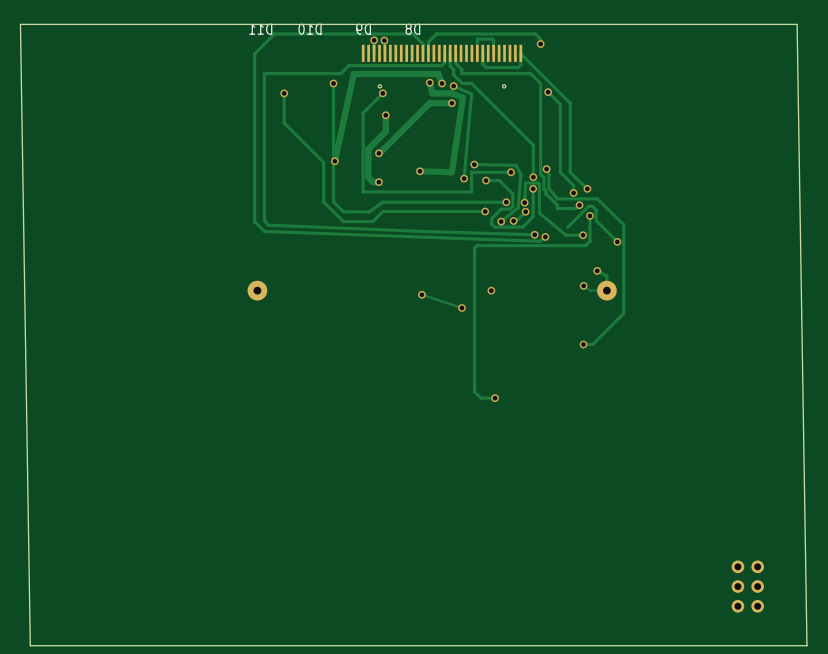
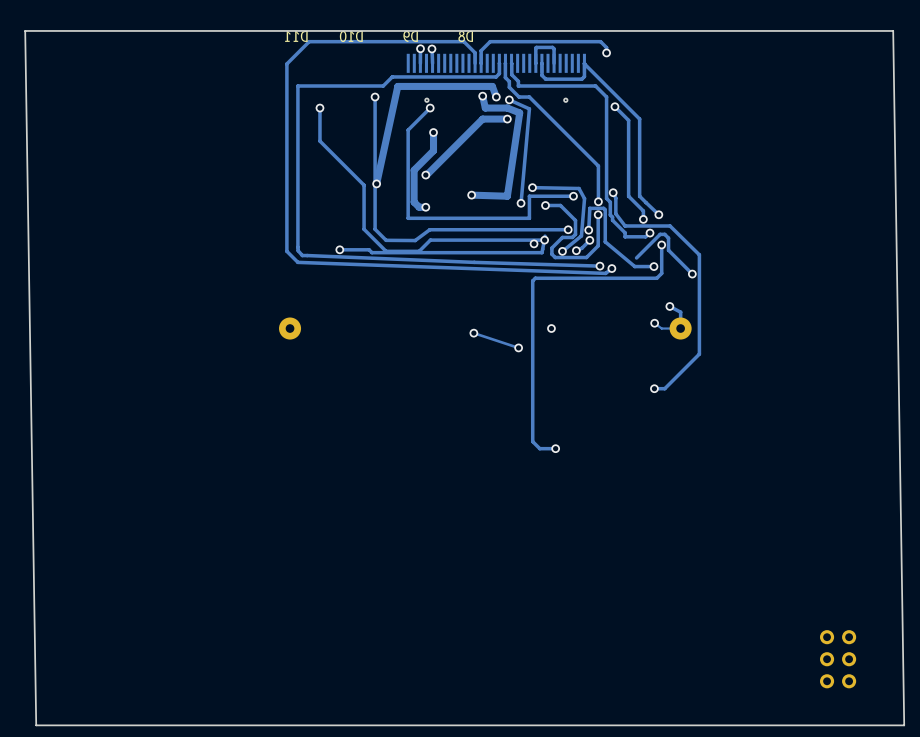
track: none -> (545, 236) (541, 252) (372, 252) (369, 249) (339, 249)
via: none -> (534, 243)
via: none -> (339, 249)

